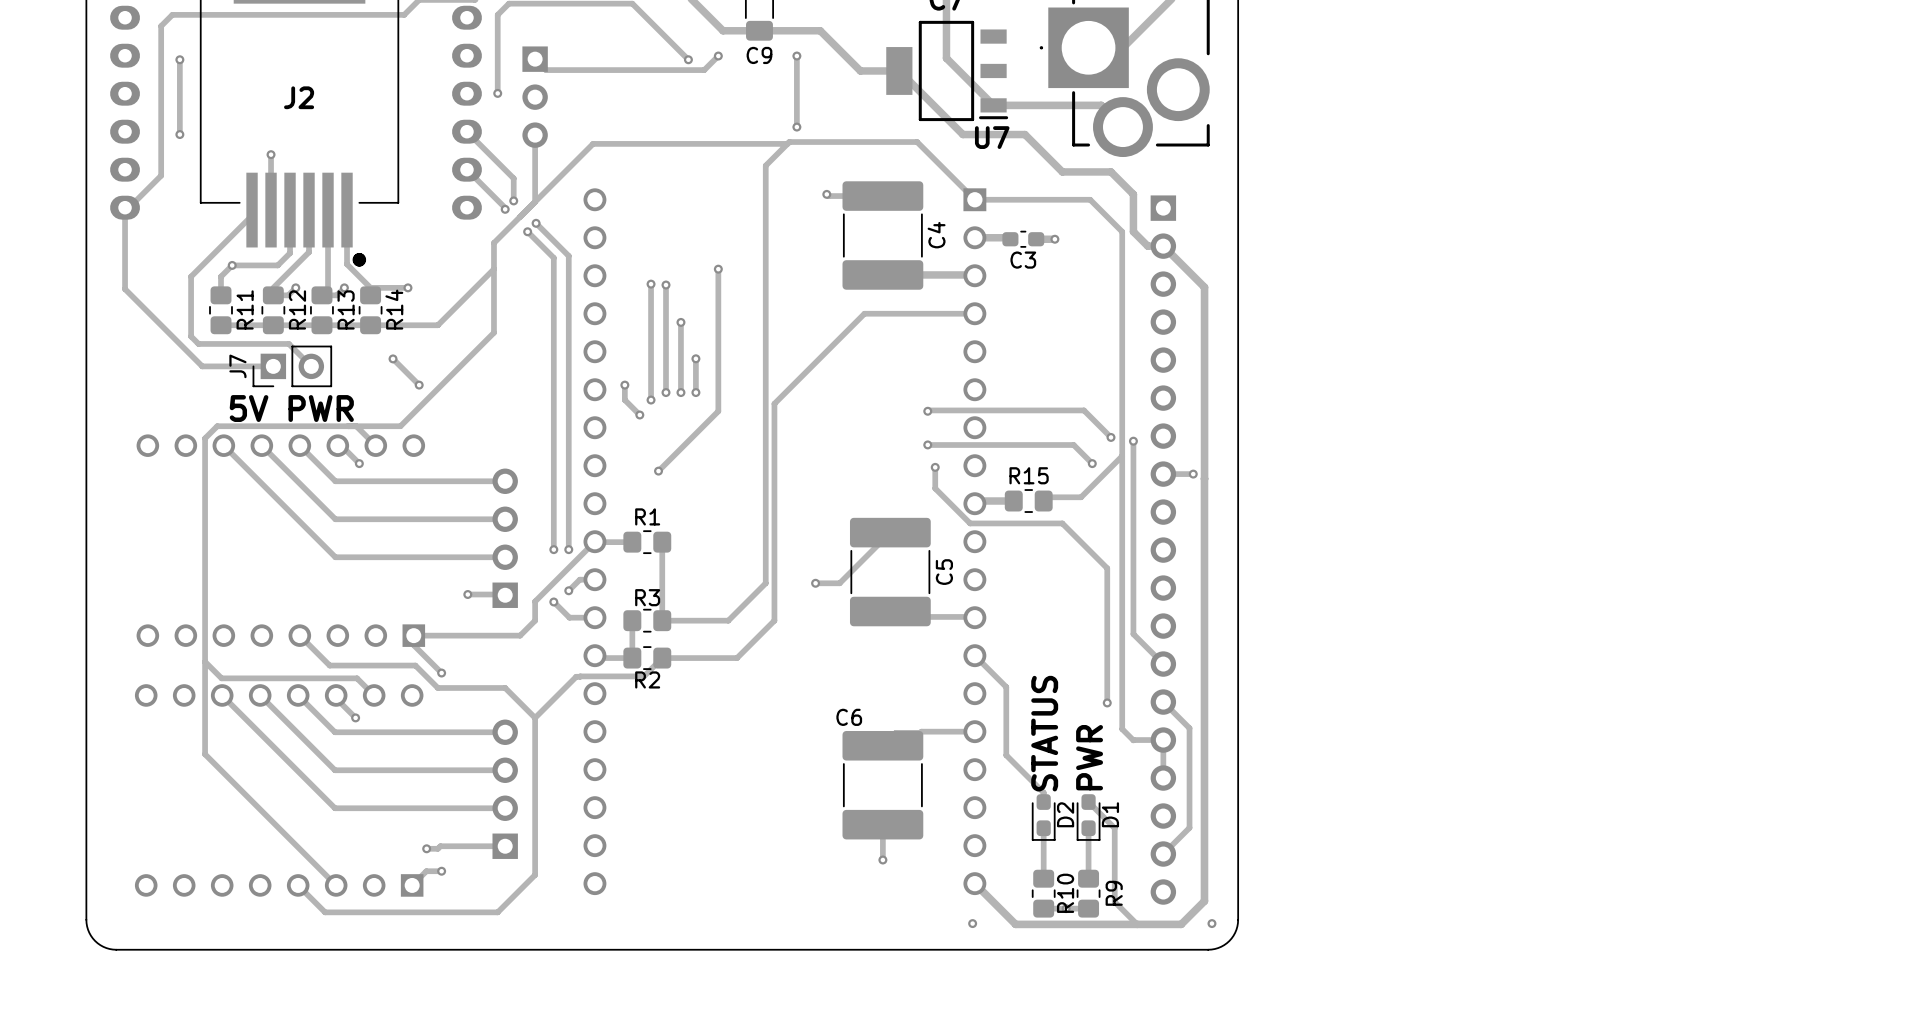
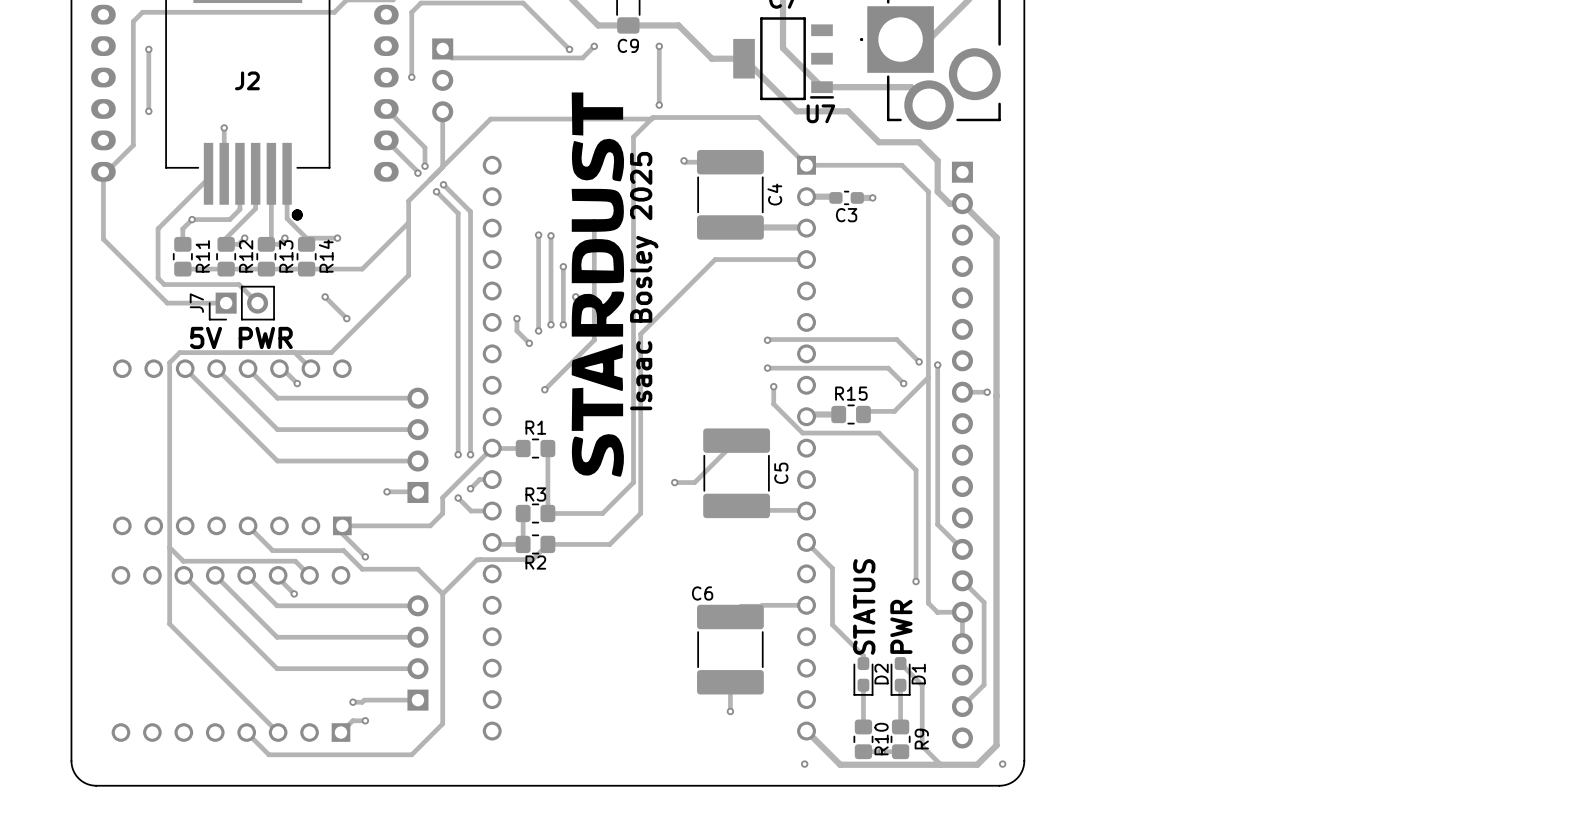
drawing: none -> [571, 92, 625, 477]
text: none -> Isaac Bosley 2025 (644, 281)

